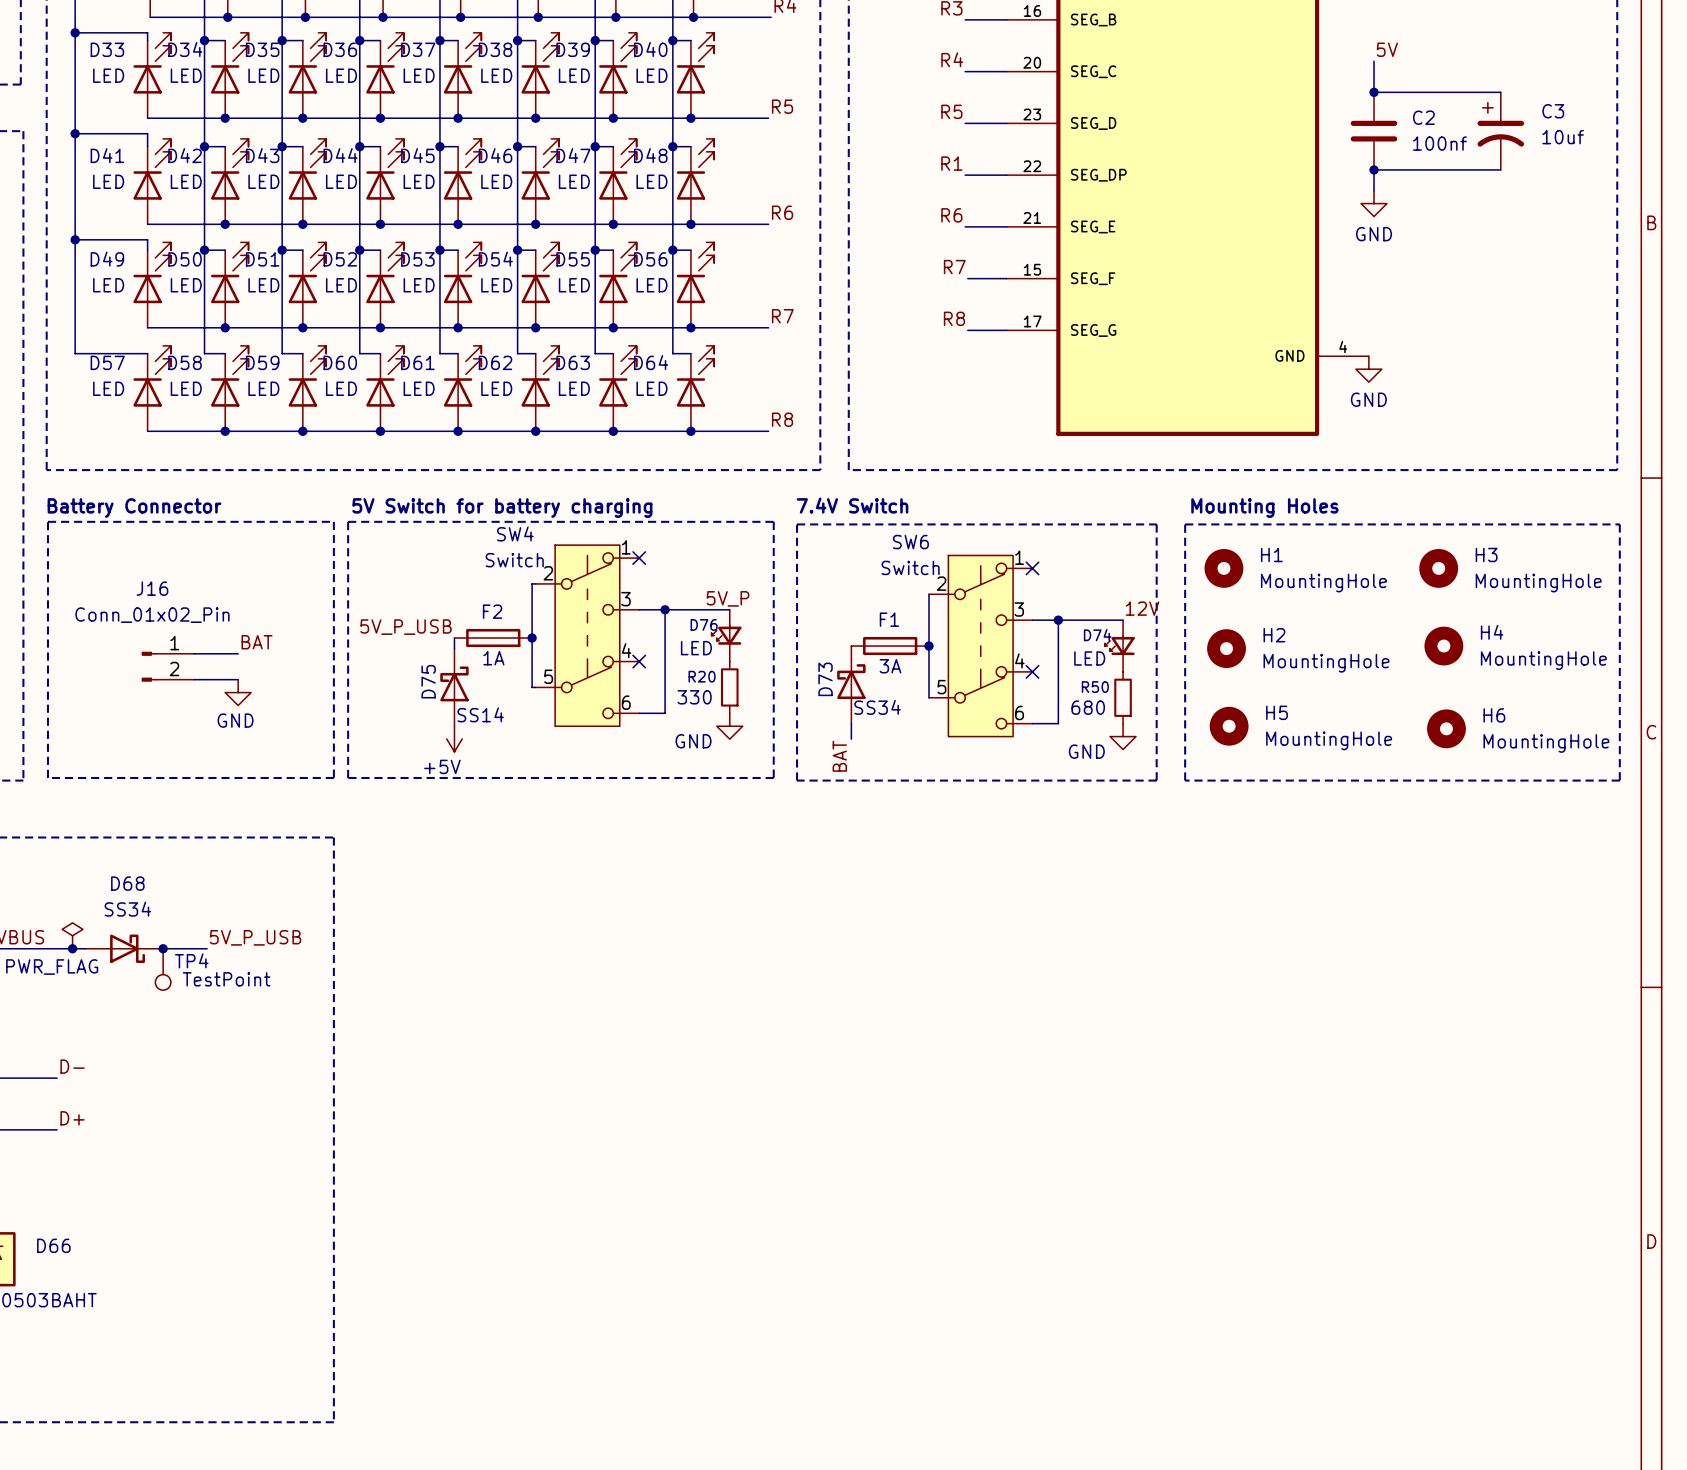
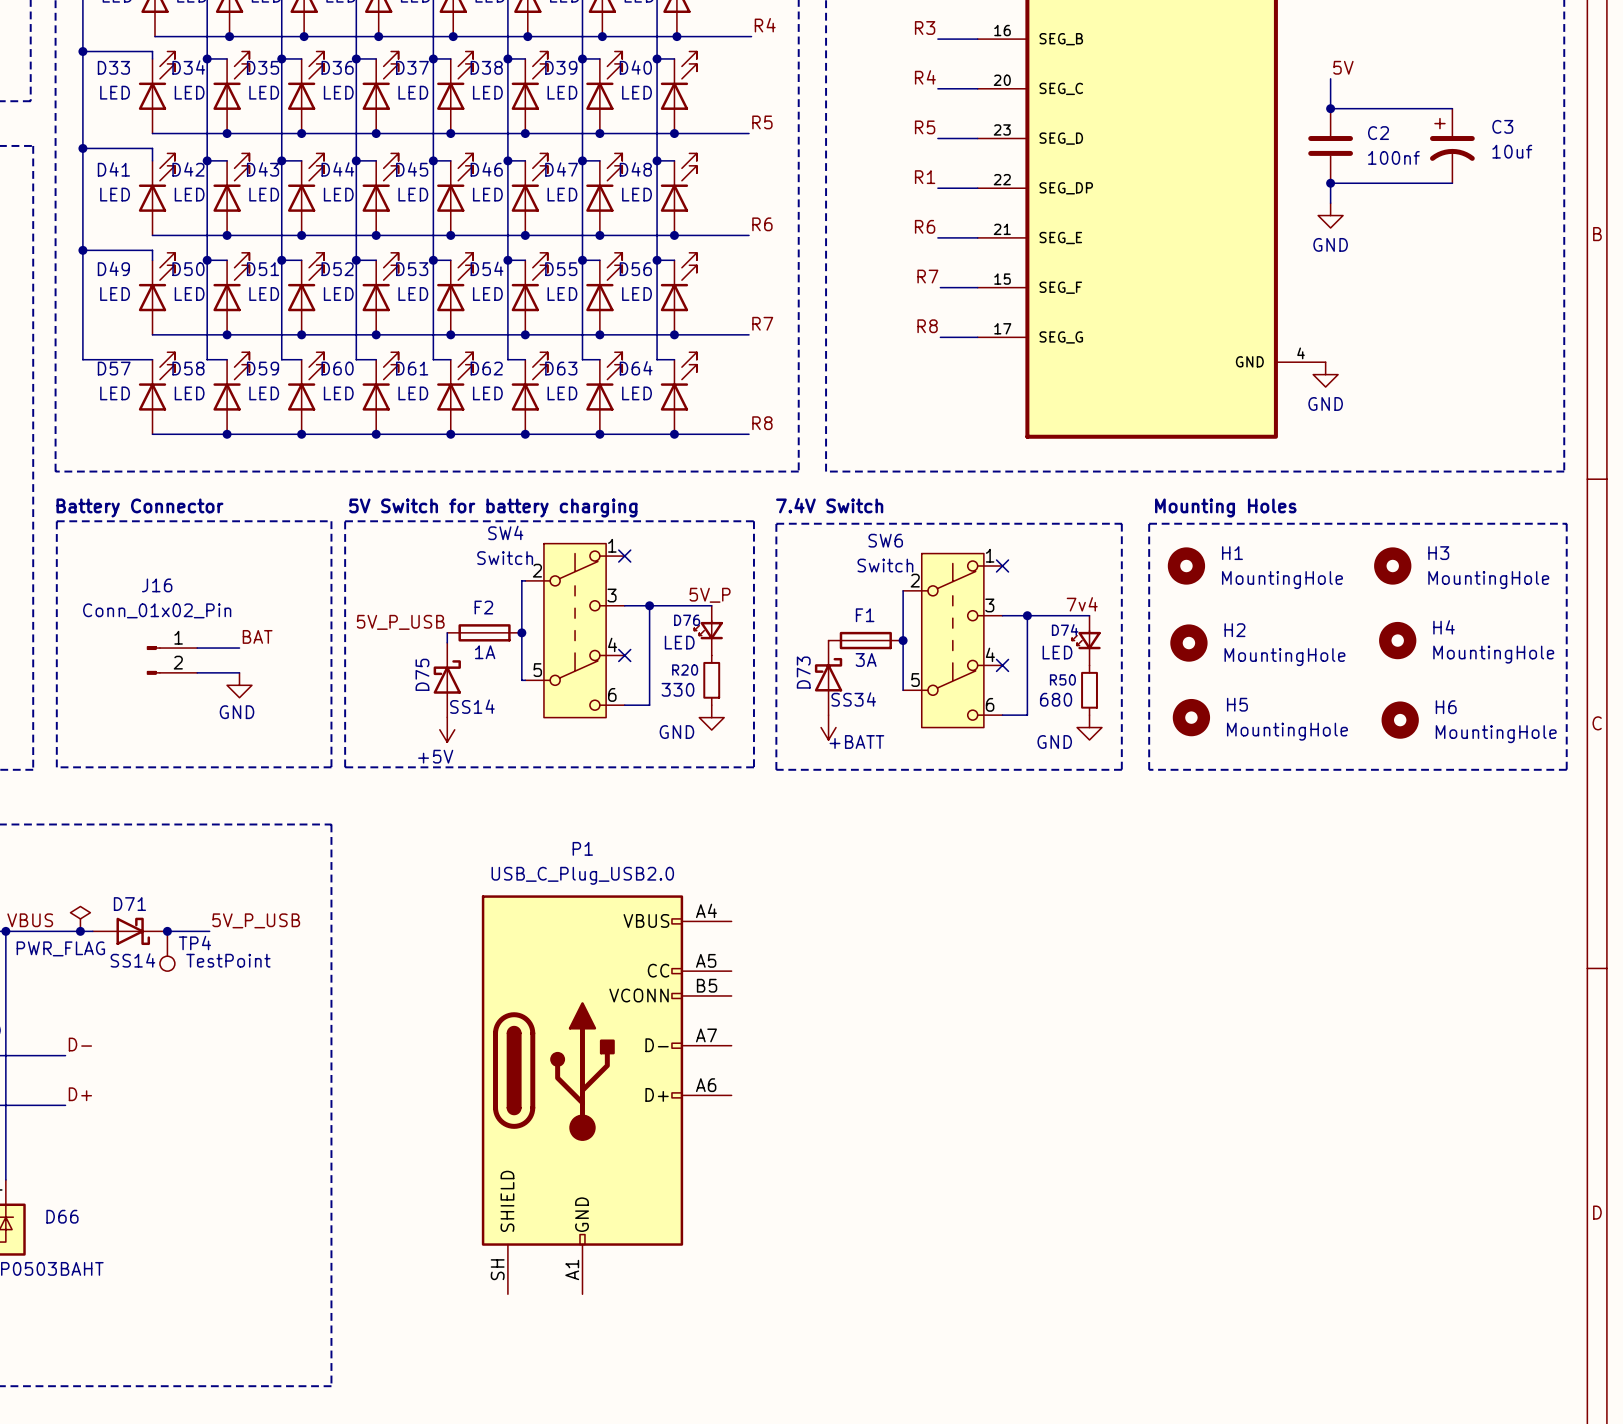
label: none -> 7v4 (1082, 604)
label: 12V (1142, 608) -> none
power symbol: none -> +BATT (828, 727)
label: BAT (839, 756) -> none
D68 name: D68 (127, 883) -> D71 (129, 904)
D68 value: SS34 (127, 909) -> SS14 (132, 960)
P1: none -> USB_C_Plug_USB2.0 (606, 1094)

